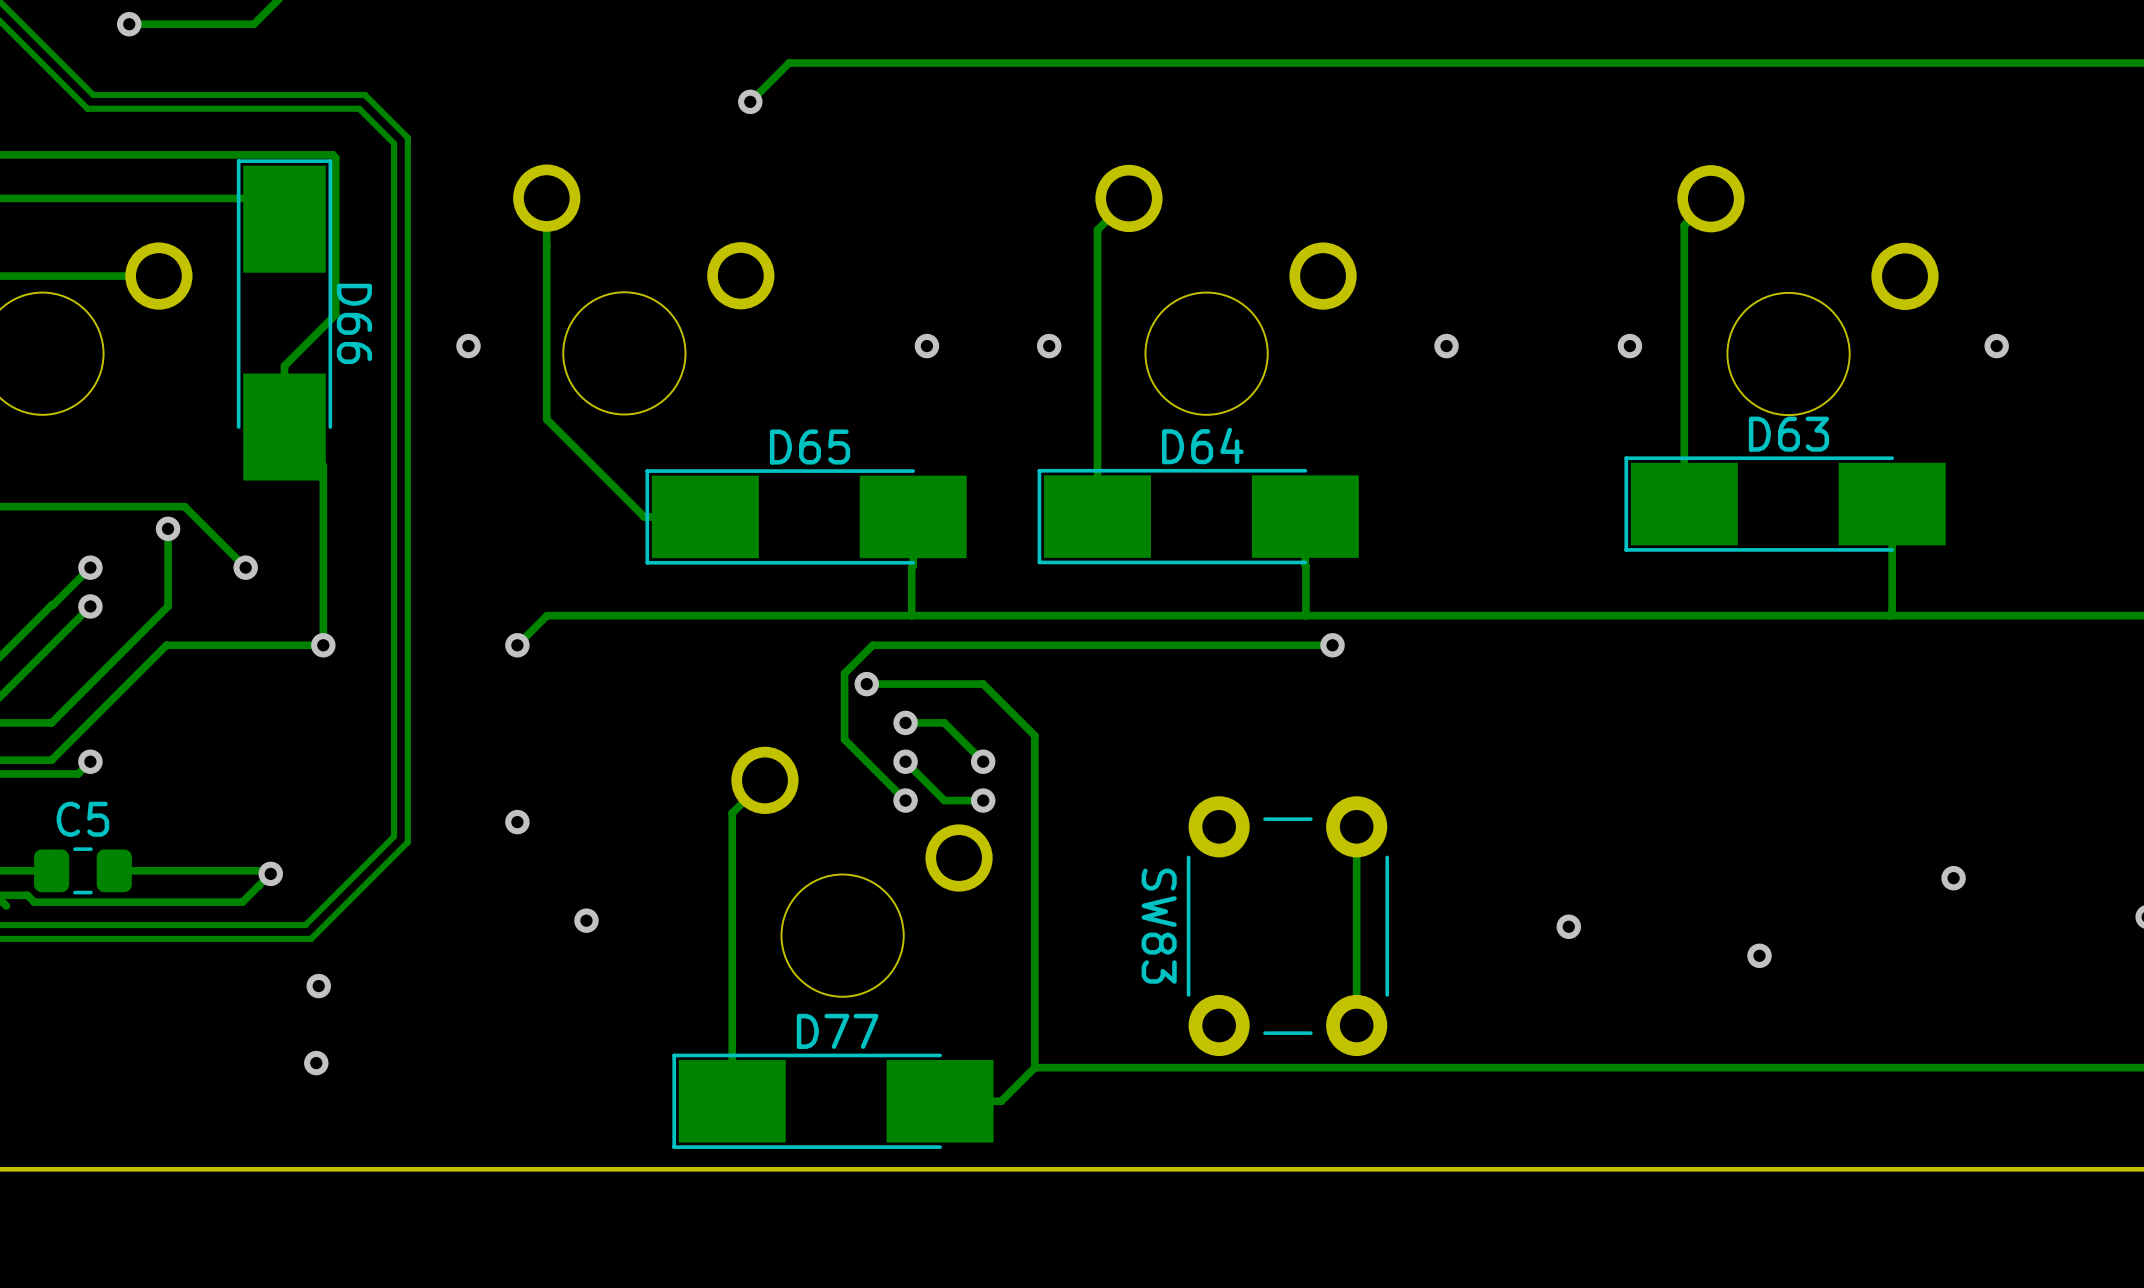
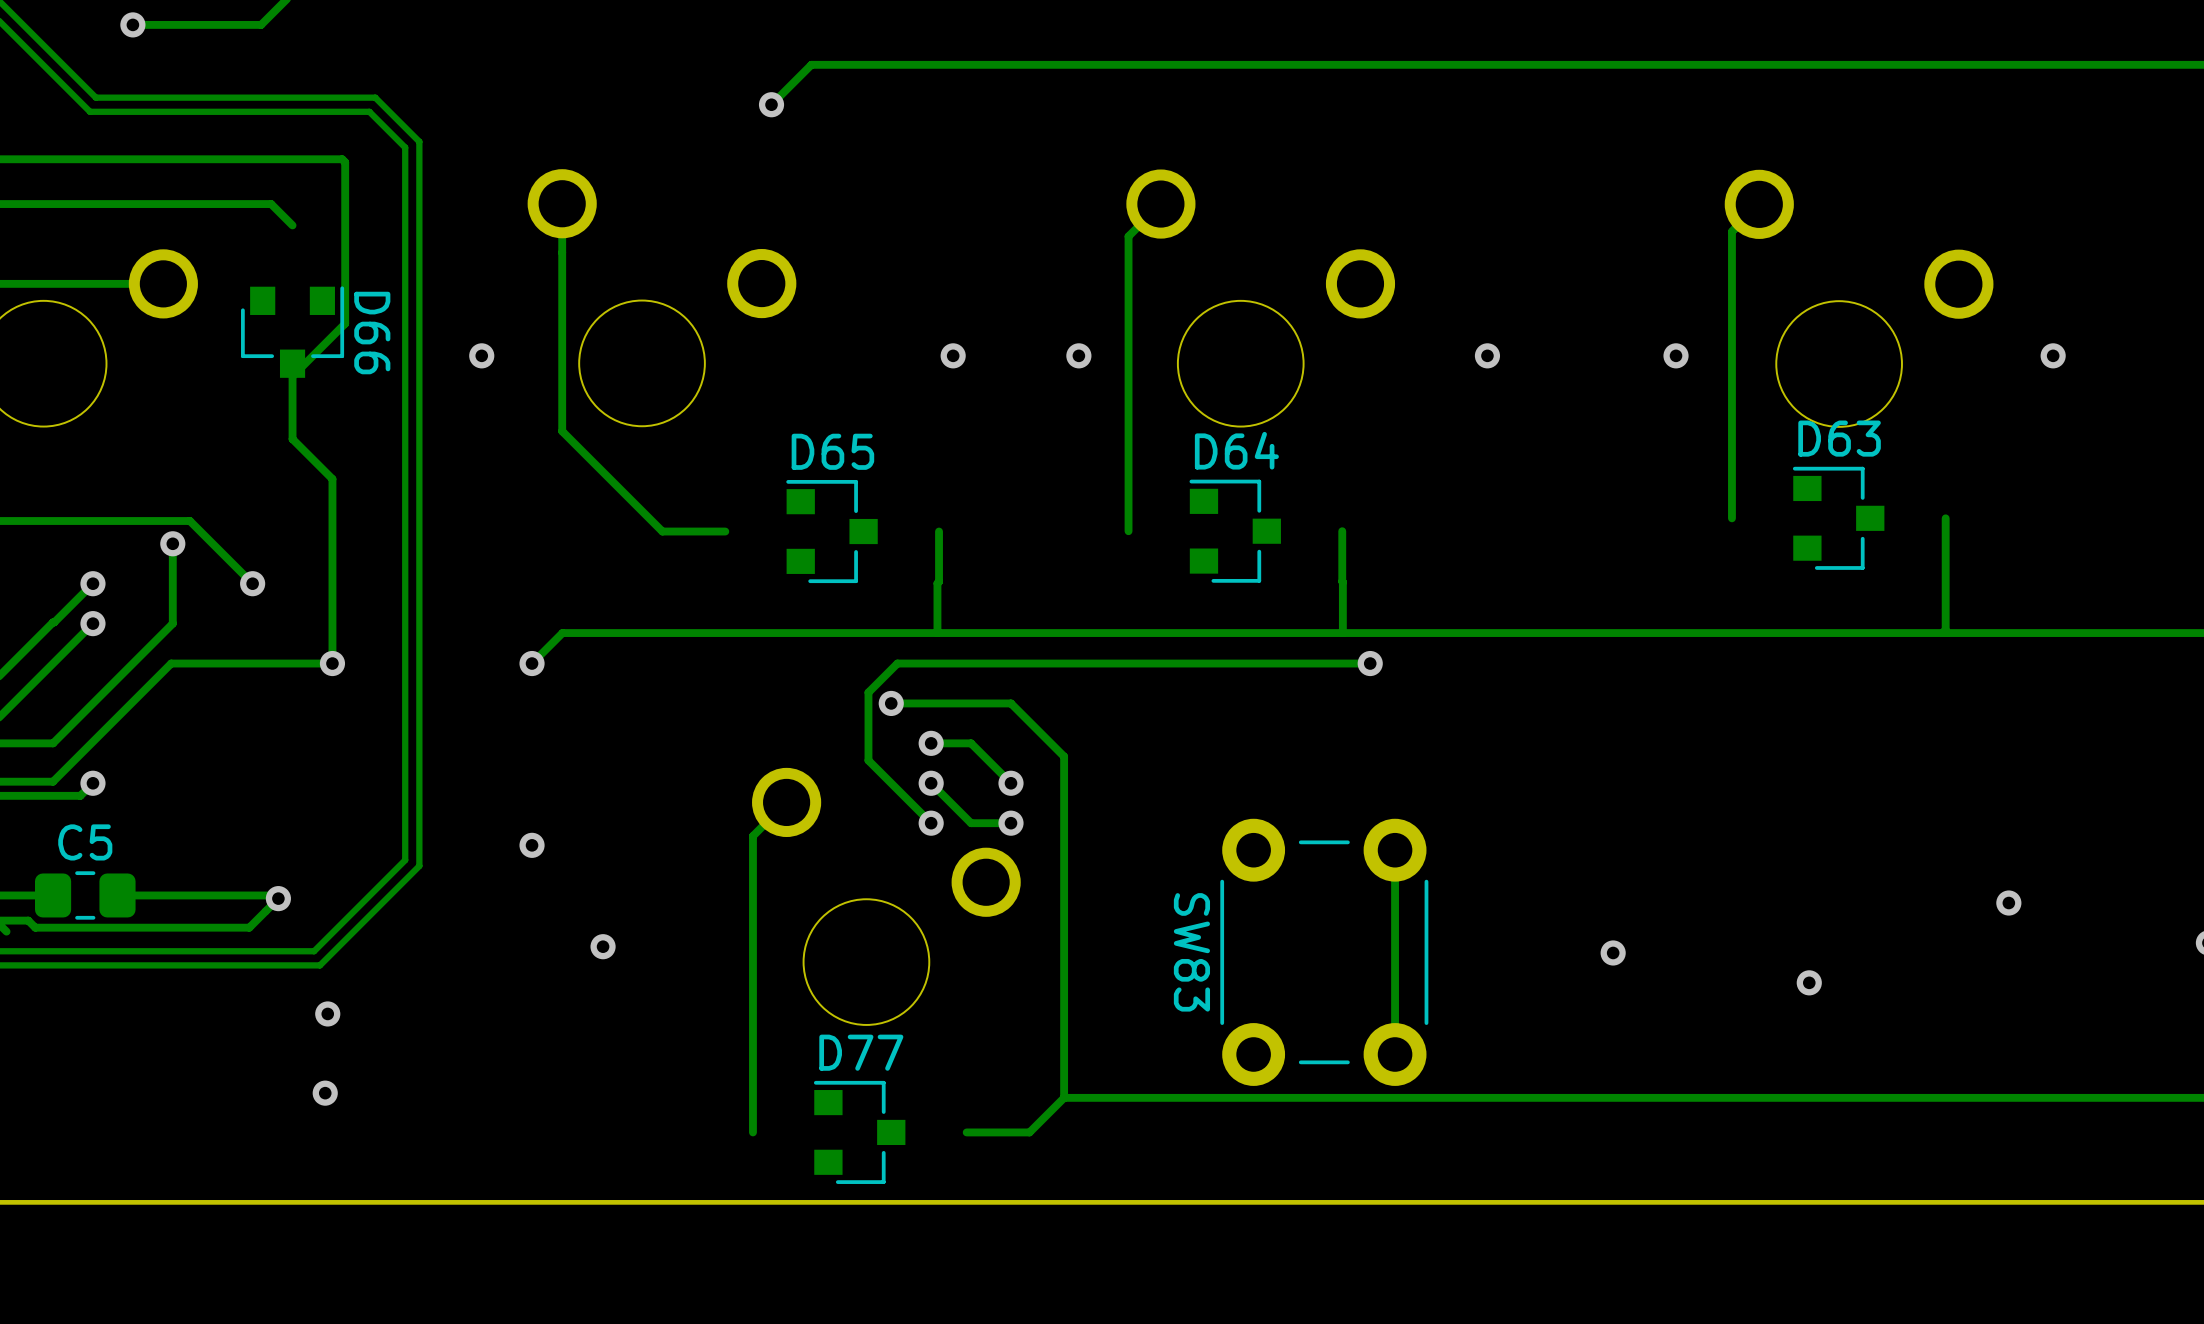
D66 footprint: [236, 159, 333, 481] -> [241, 286, 345, 378]
D63 footprint: [1624, 456, 1946, 552] -> [1792, 466, 1885, 570]
D64 footprint: [1037, 468, 1359, 565] -> [1189, 479, 1281, 583]
D65 footprint: [645, 469, 967, 565] -> [786, 479, 878, 584]
D77 footprint: [672, 1053, 994, 1149] -> [813, 1080, 906, 1184]

